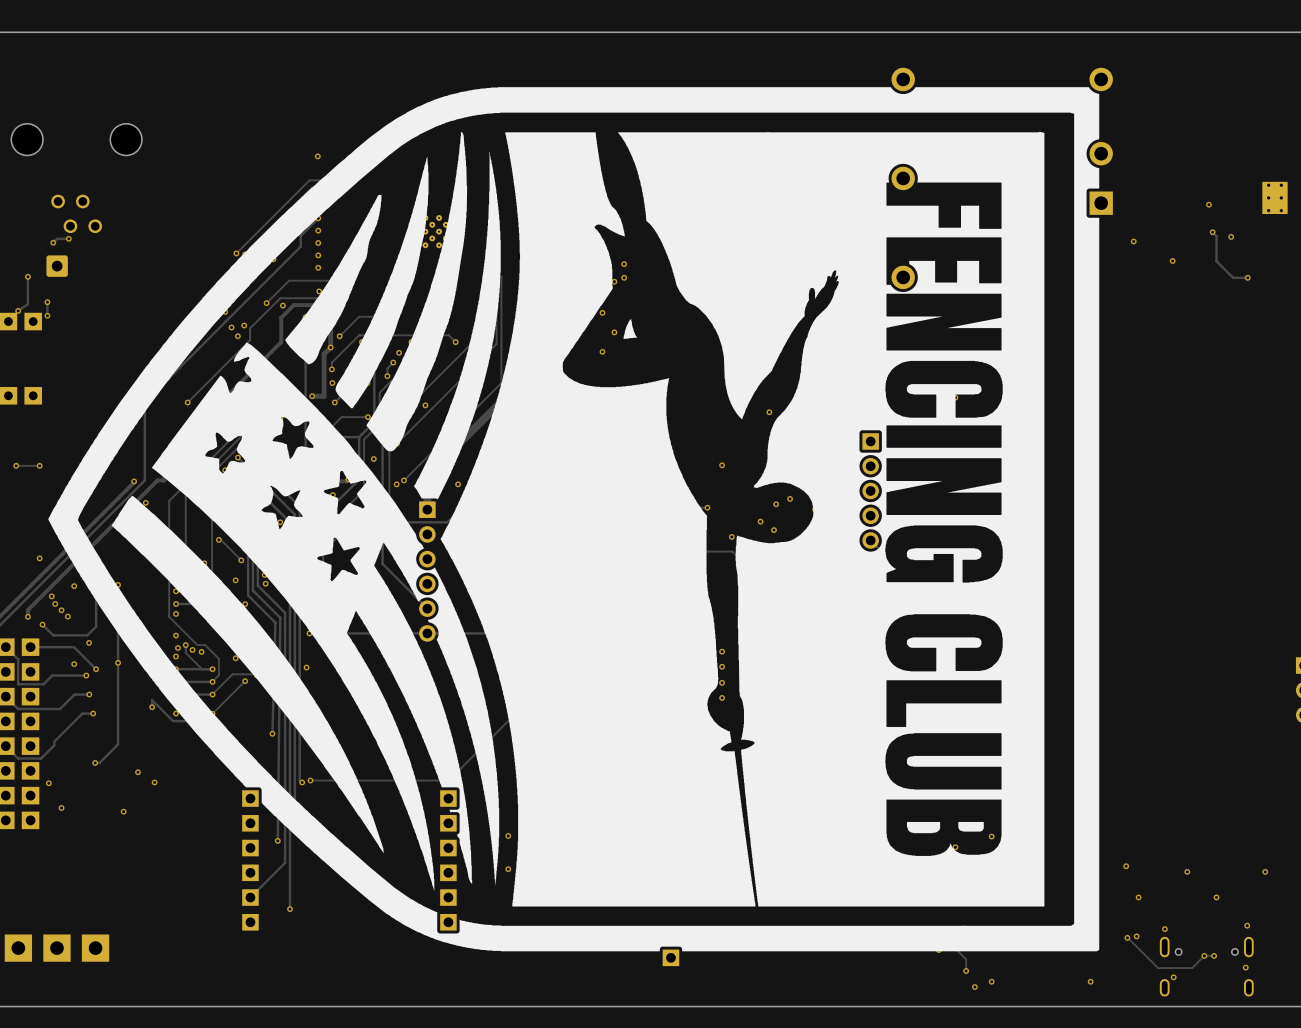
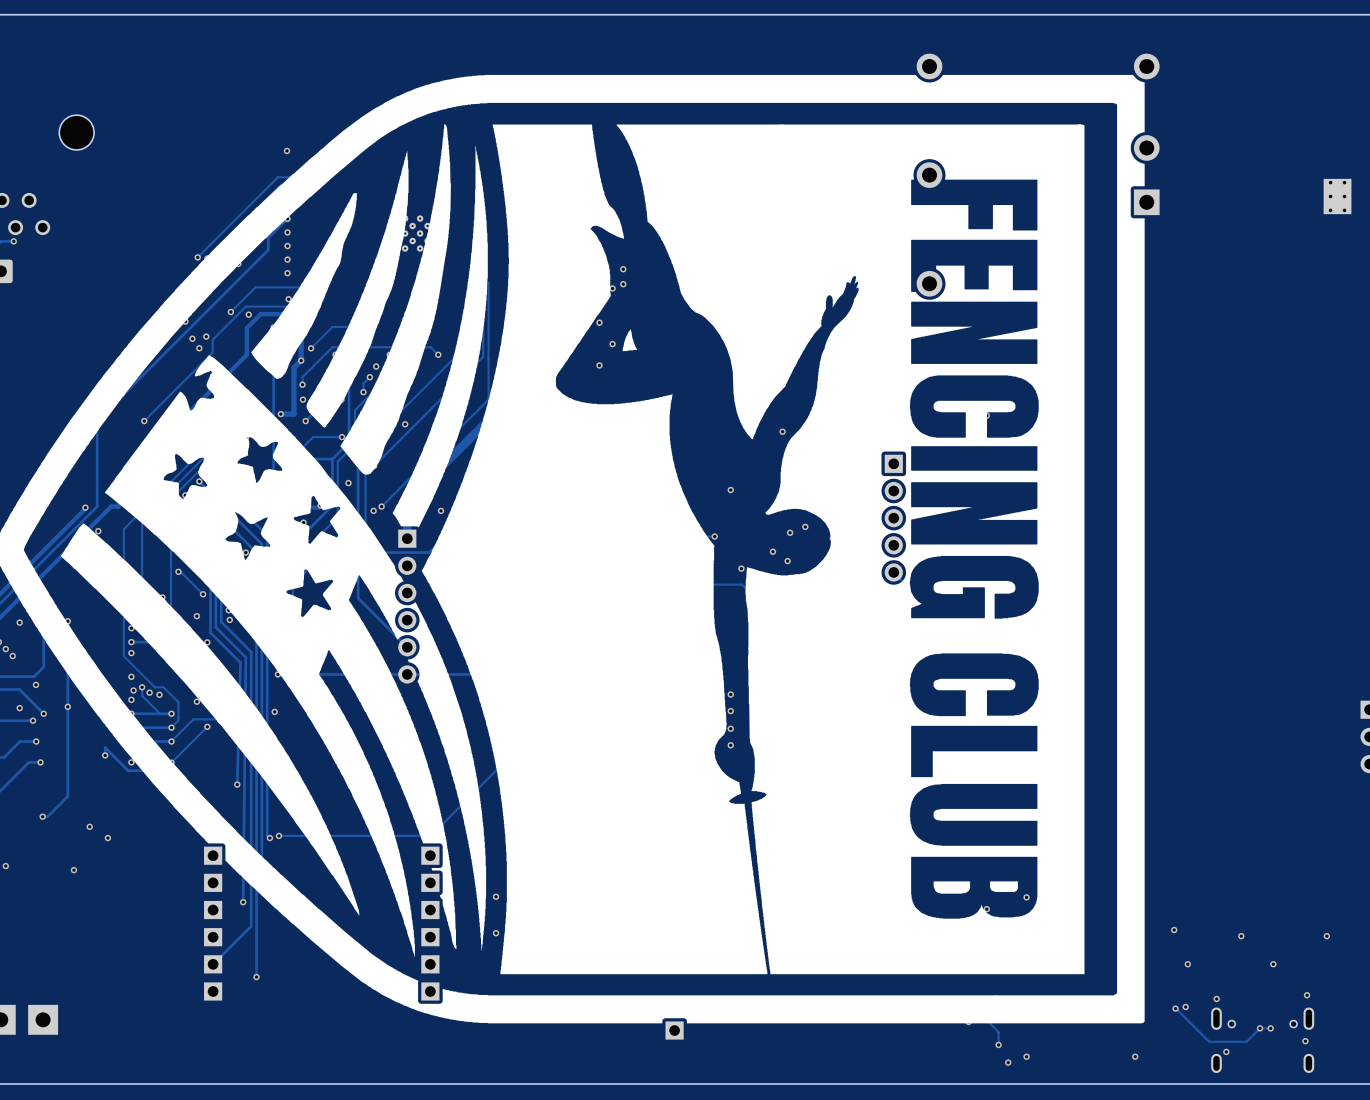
via: (1208, 204) -> none
track: (1212, 232) (1216, 236) (1216, 261) (1233, 277) (1247, 277) -> none
via: (1212, 232) -> none
via: (1231, 236) -> none
via: (1133, 241) -> none
via: (1172, 261) -> none
via: (1247, 277) -> none

